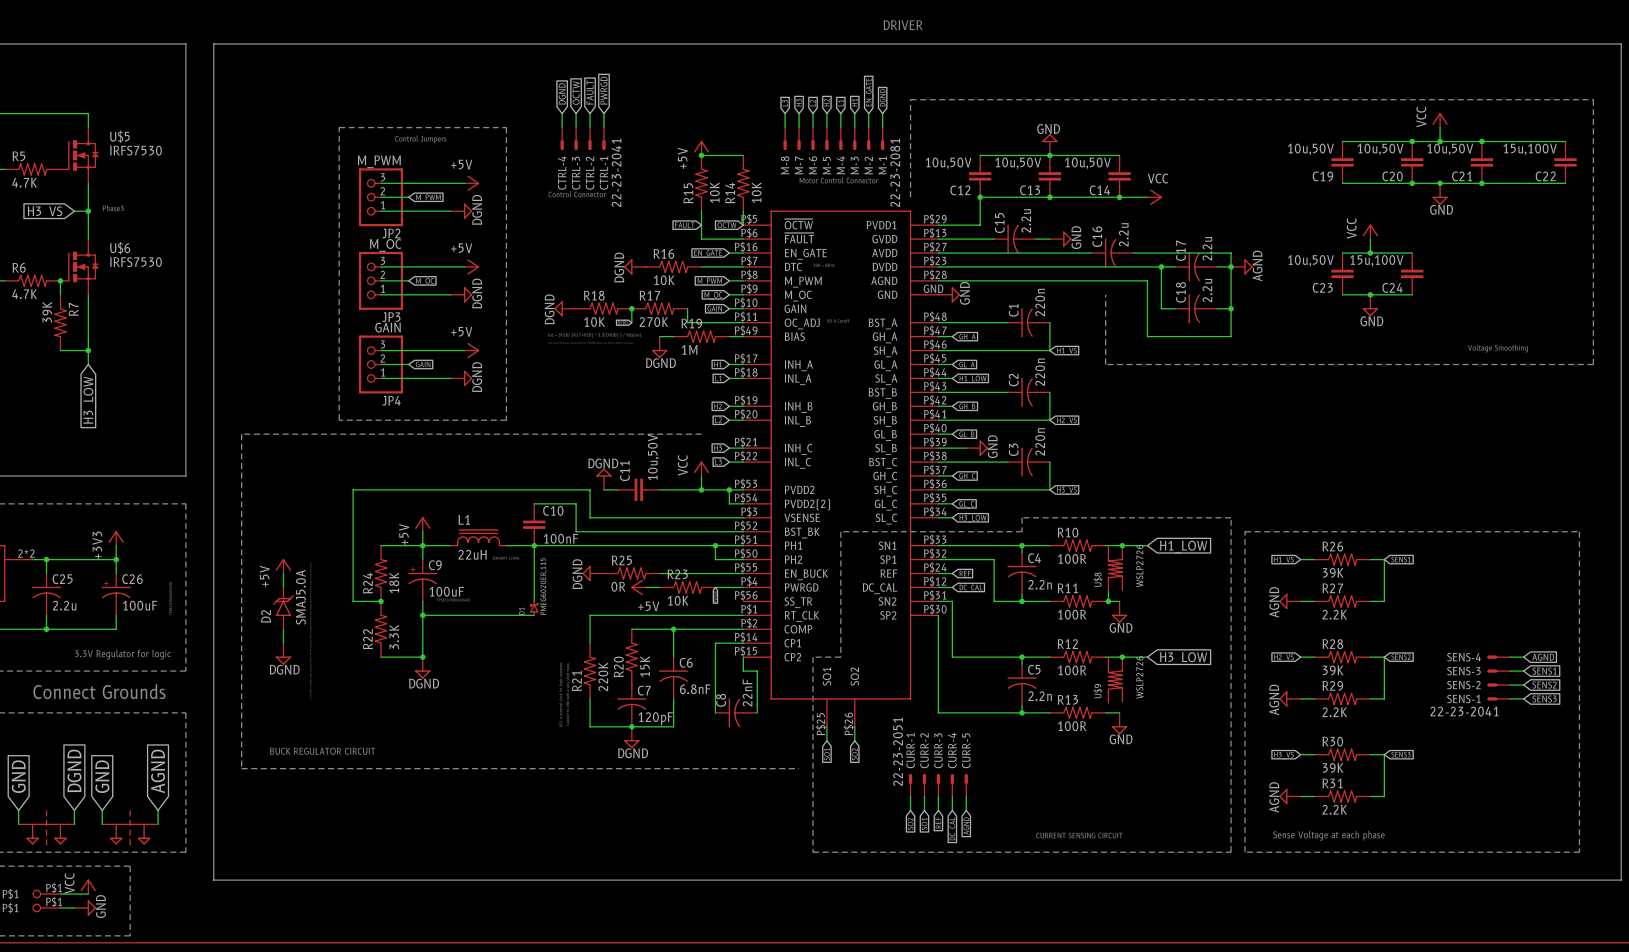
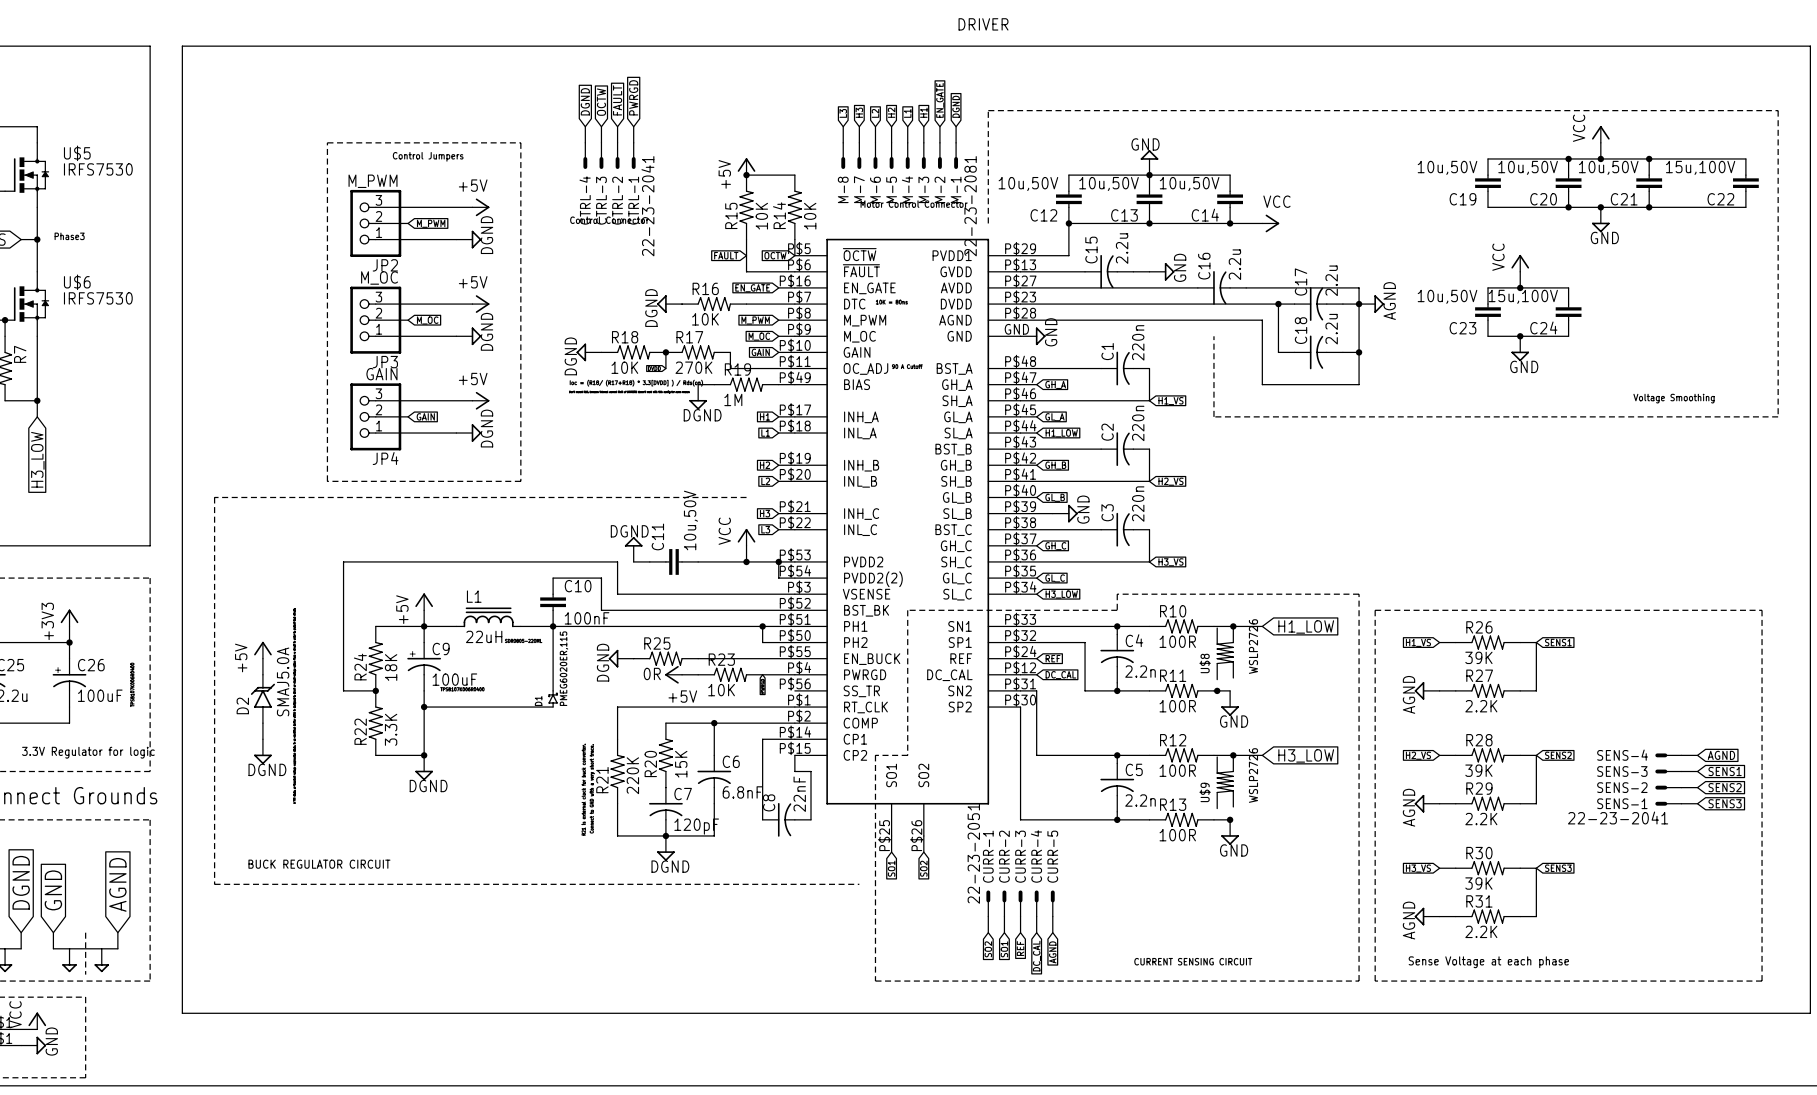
wire: (1108, 591) (1108, 601) -> none
junction: none -> (1230, 819)

